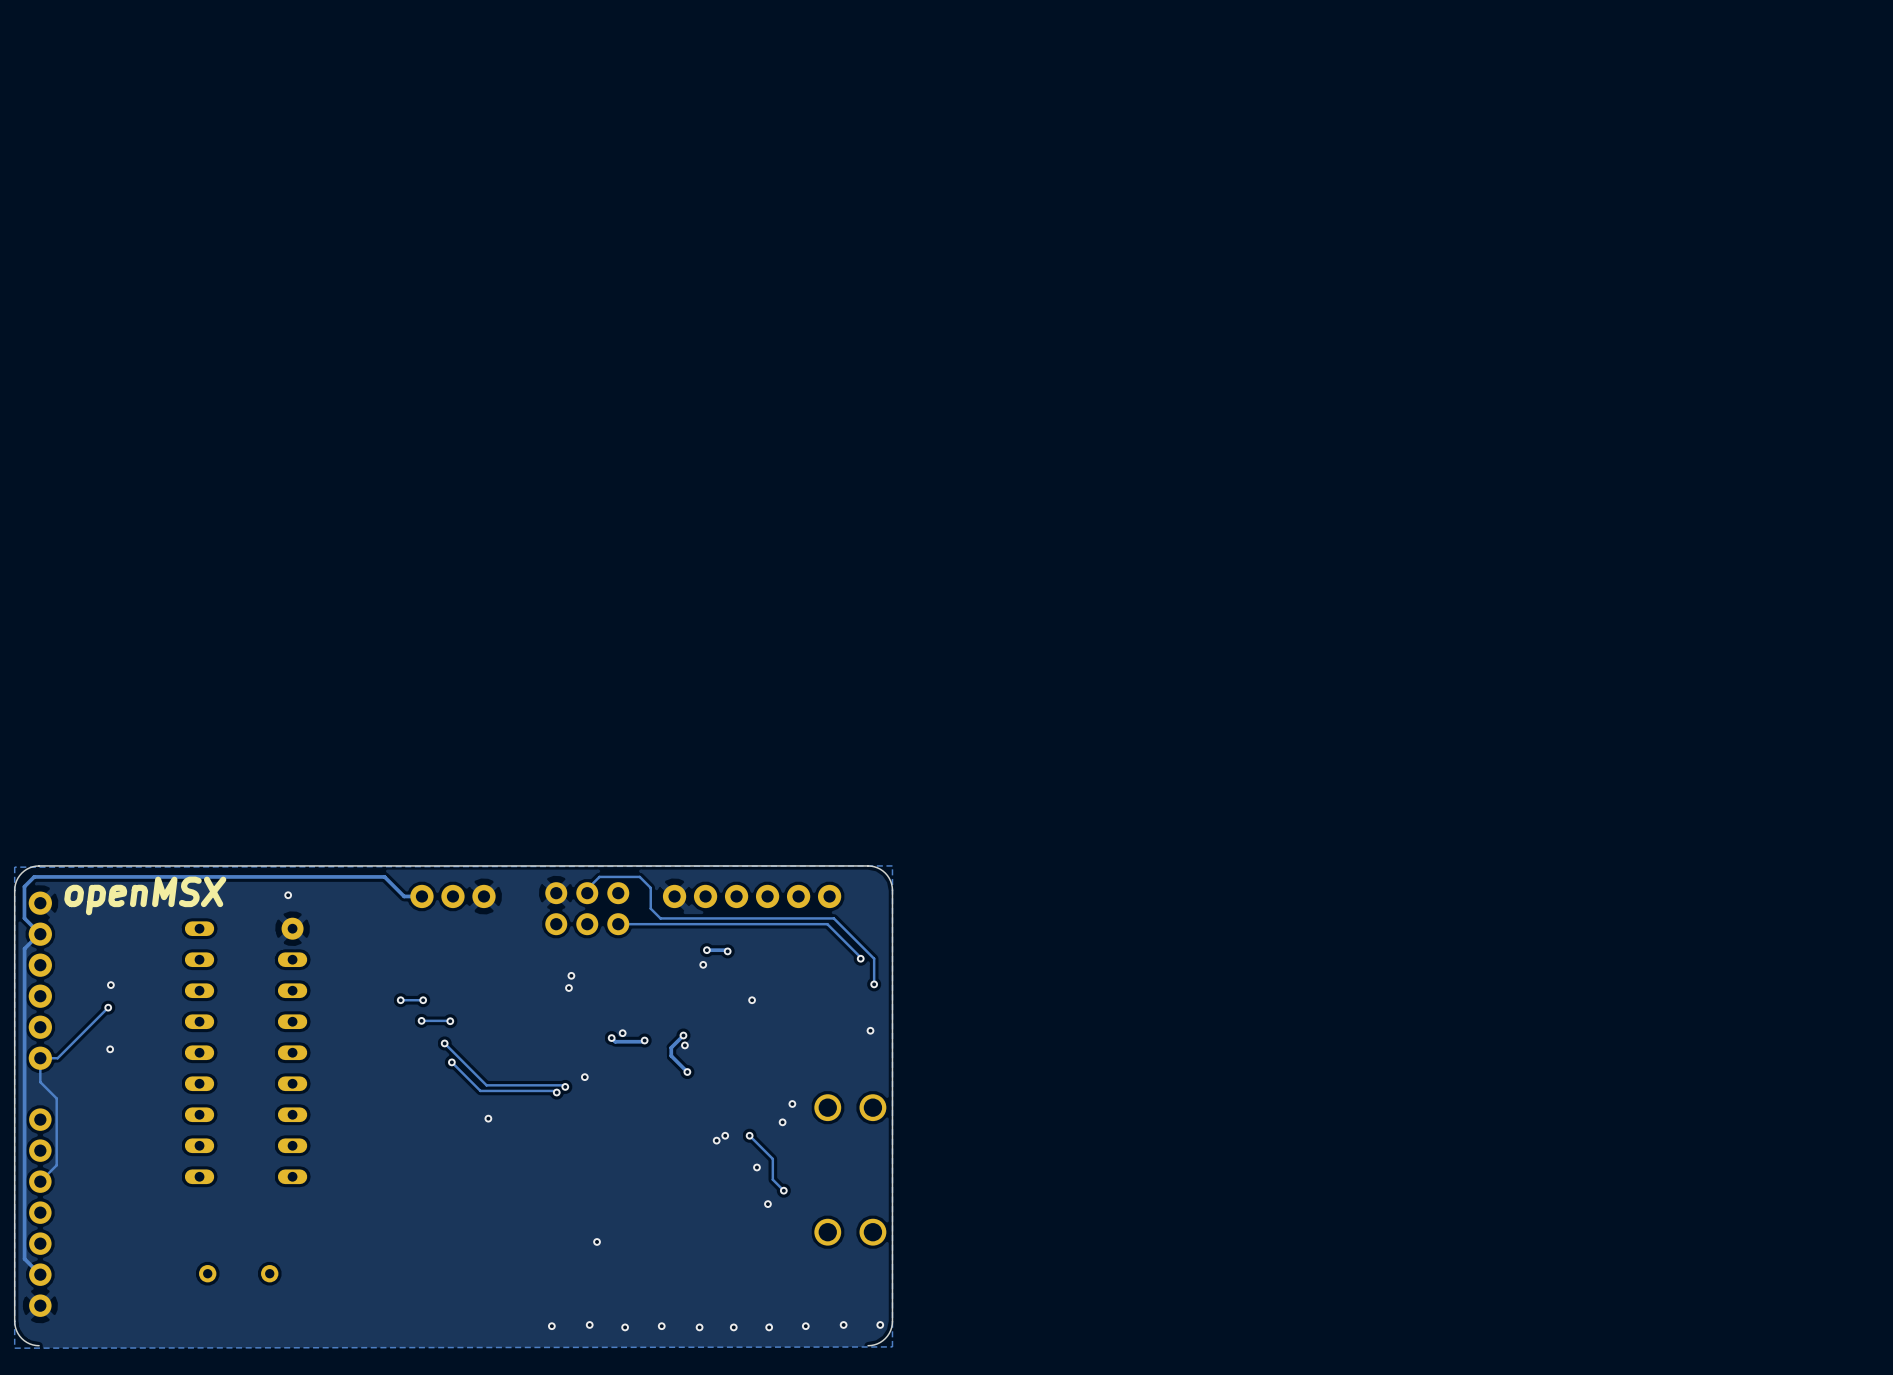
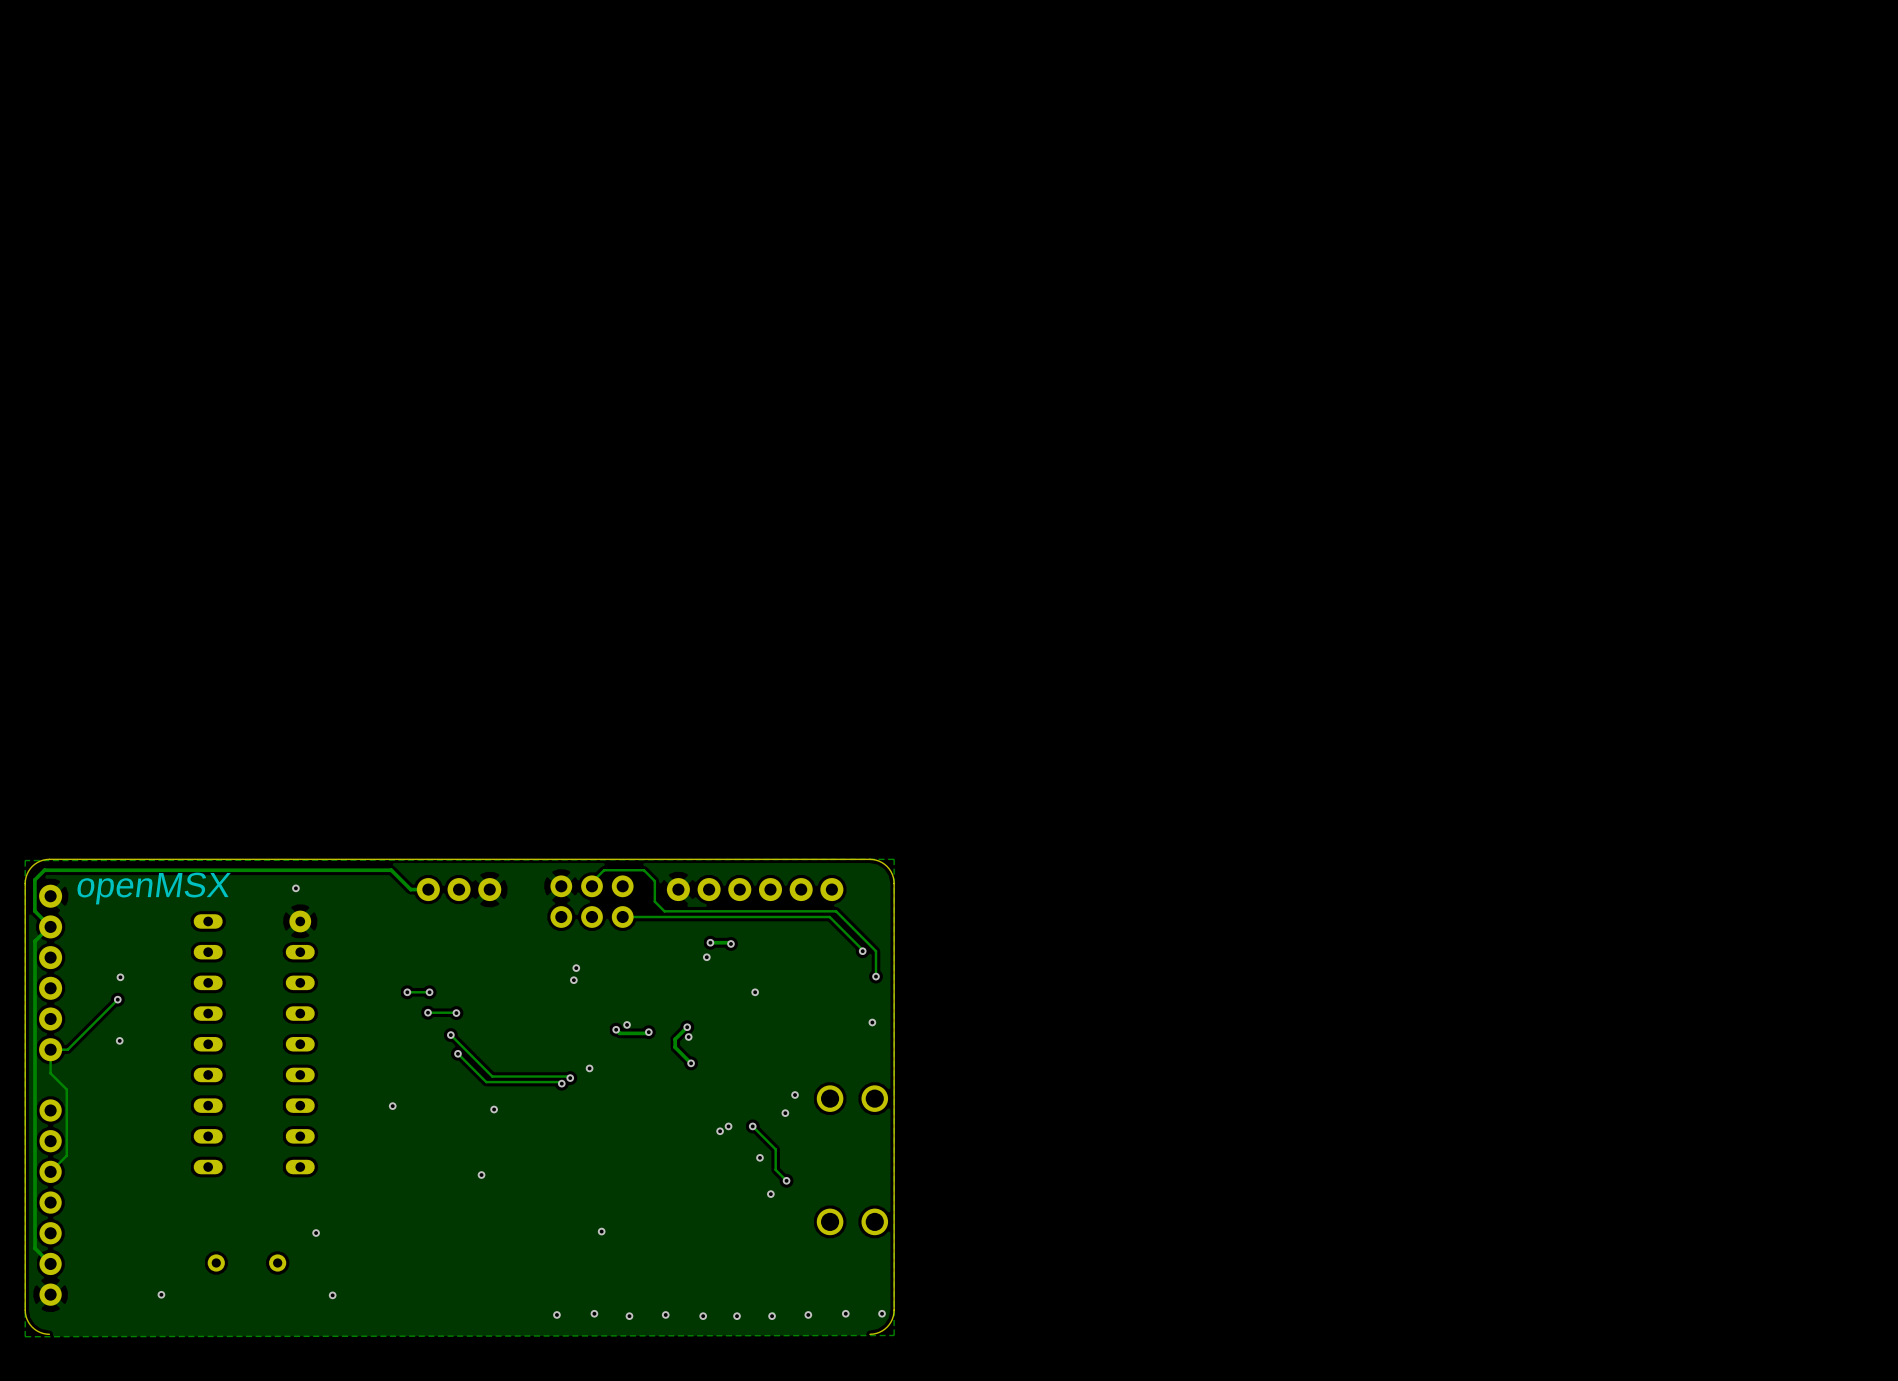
via: none -> (392, 1106)
via: none -> (481, 1175)
via: none -> (316, 1233)
via: none -> (161, 1294)
via: none -> (332, 1295)

